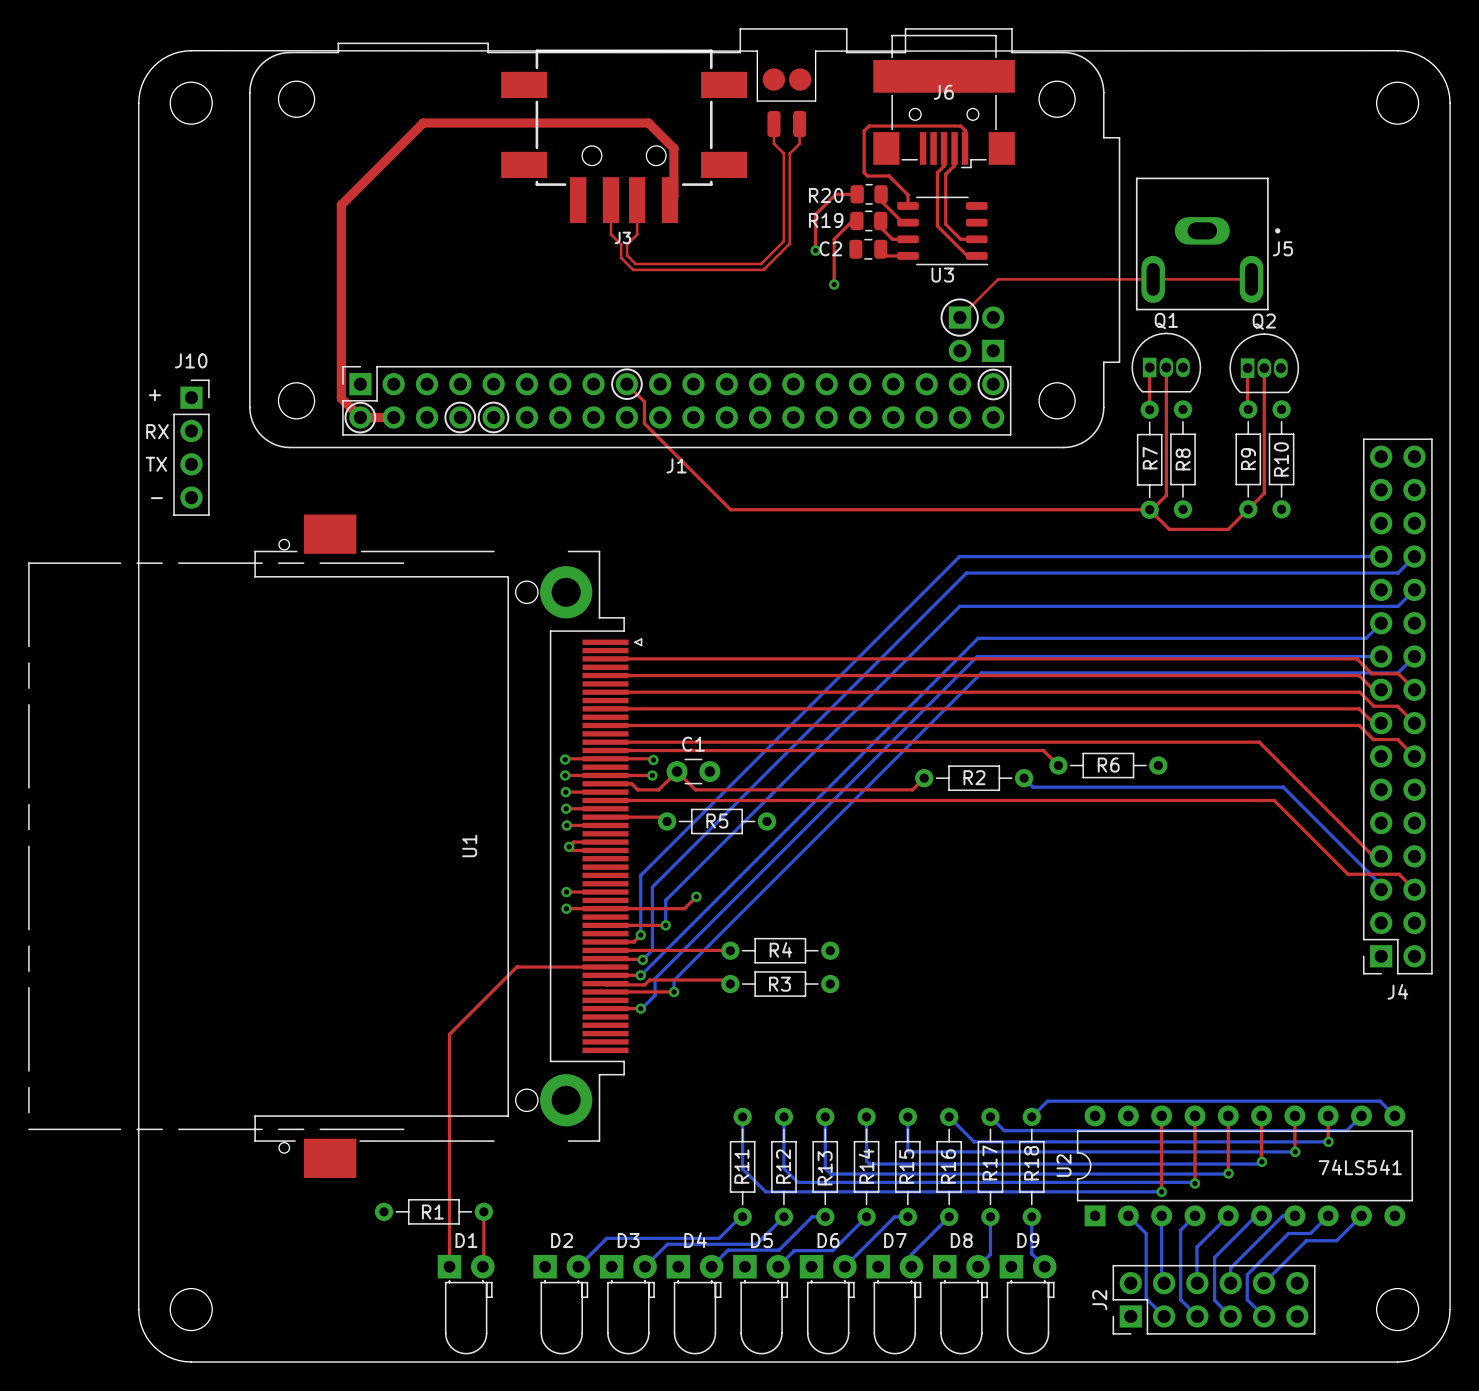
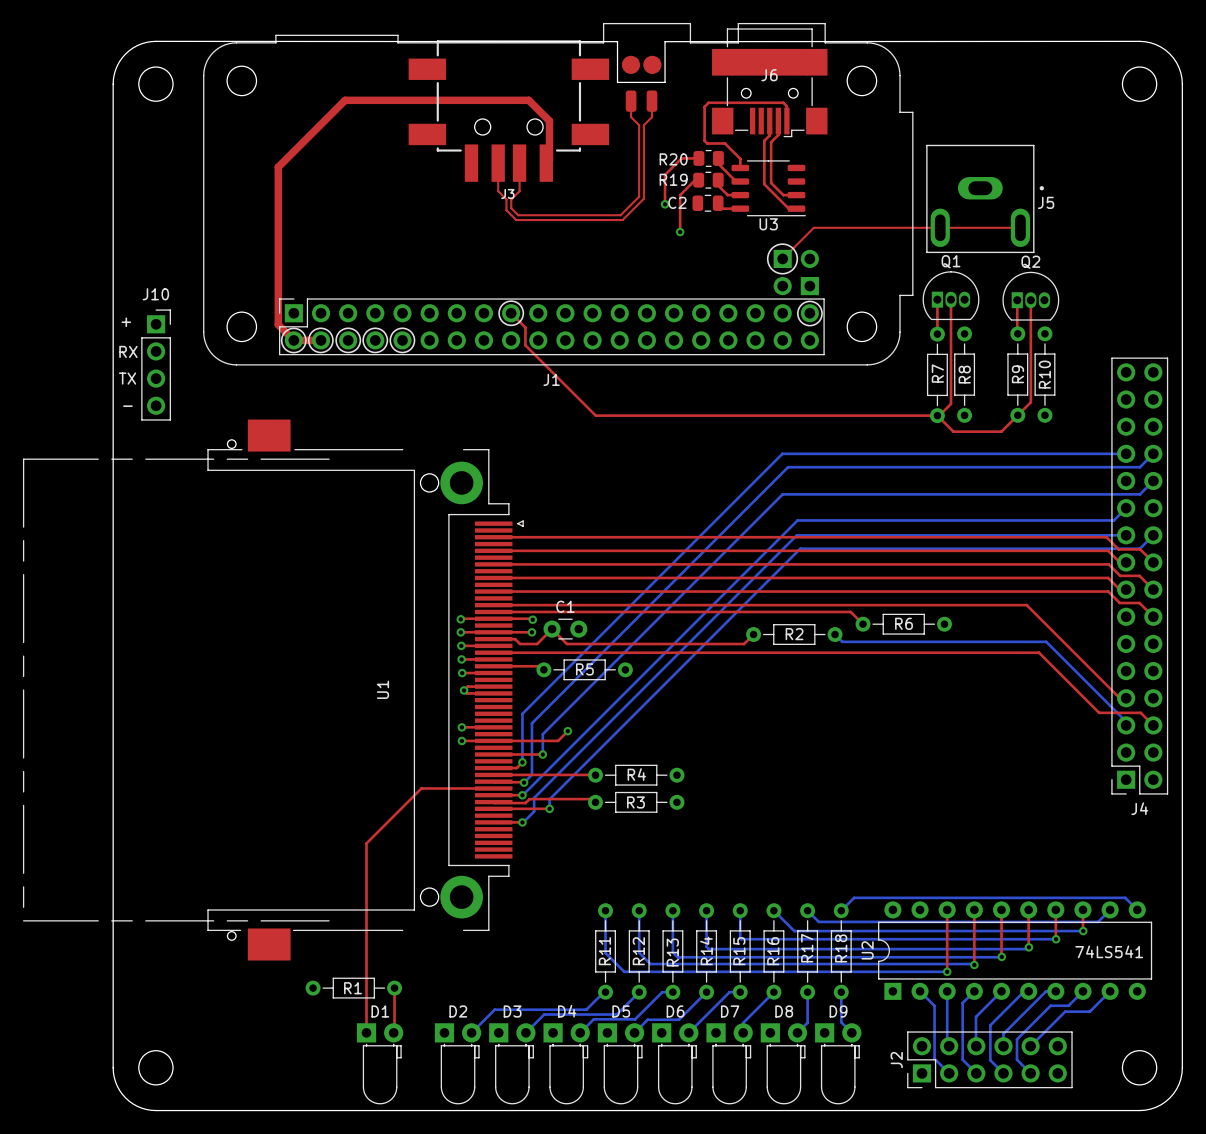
drawing: none -> [307, 327, 362, 354]

